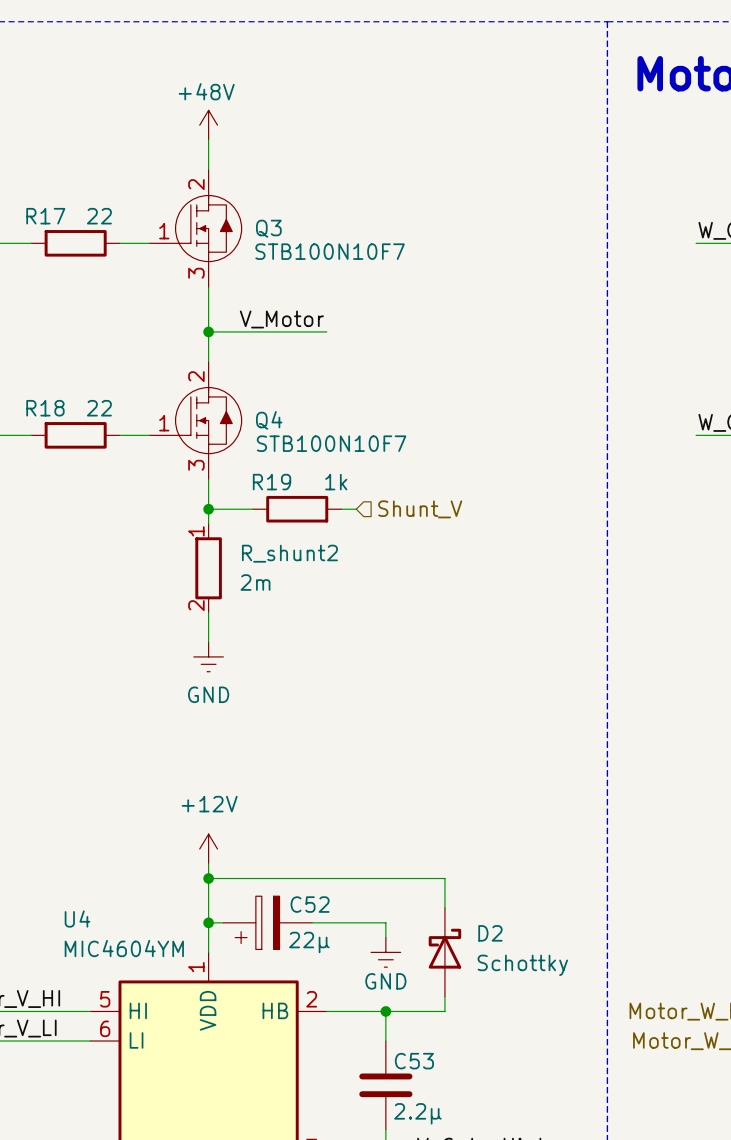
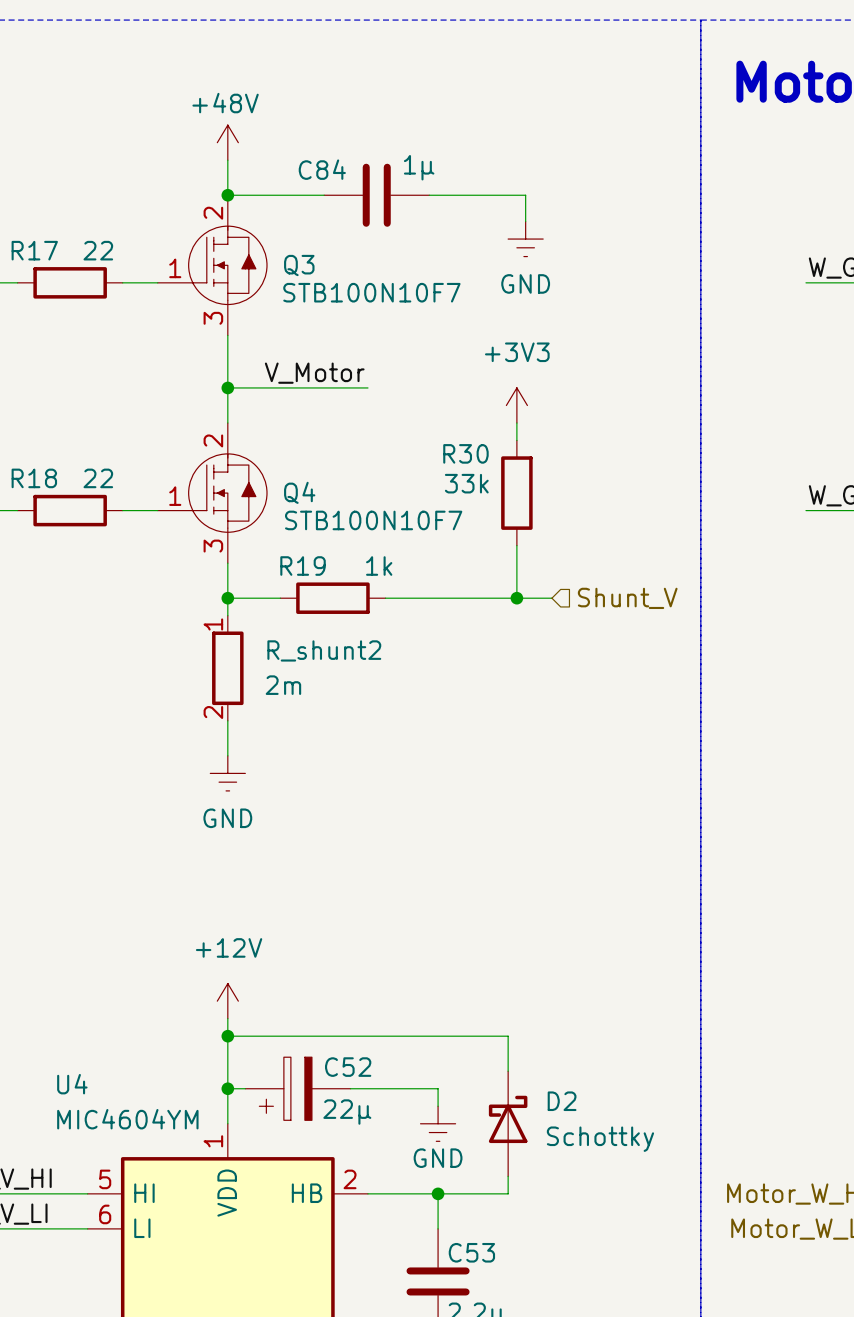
wire: none -> (227, 195) (324, 195)
junction: none -> (227, 195)
C84: none -> 1µ (376, 195)
wire: none -> (429, 195) (525, 195) (525, 221)
power symbol: none -> GND (525, 239)
power symbol: none -> +3V3 (516, 405)
wire: none -> (516, 423) (516, 440)
R30: none -> 33k (516, 493)
wire: none -> (516, 545) (516, 598)
wire: none -> (403, 598) (551, 598)
hierarchical label position: Shunt_V (420, 509) -> Shunt_V (627, 598)
junction: none -> (516, 598)

